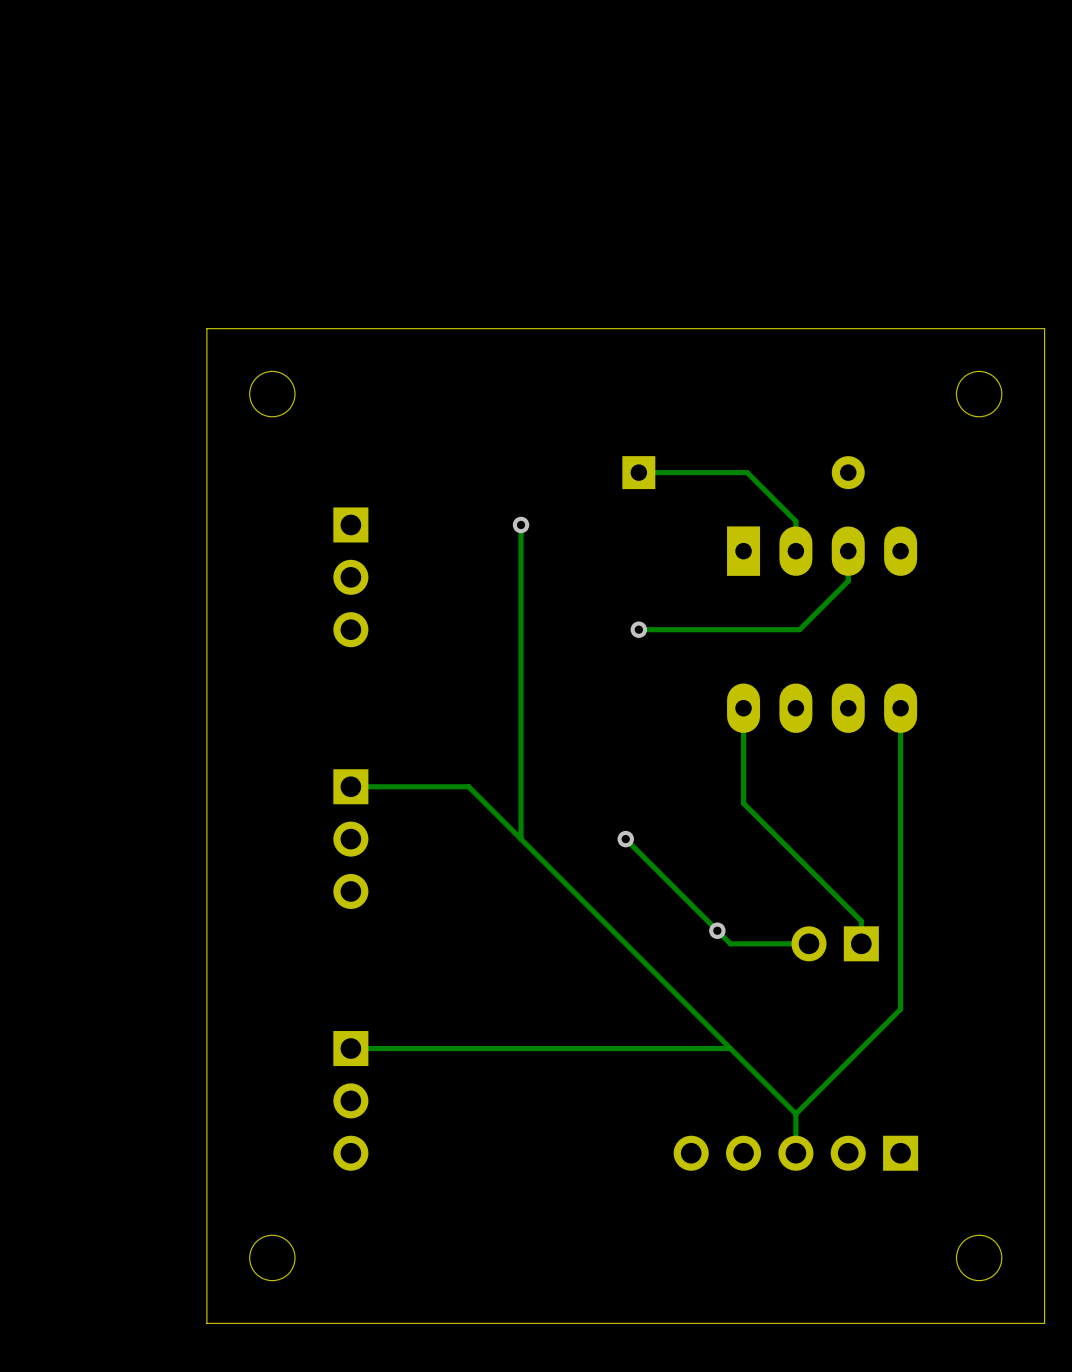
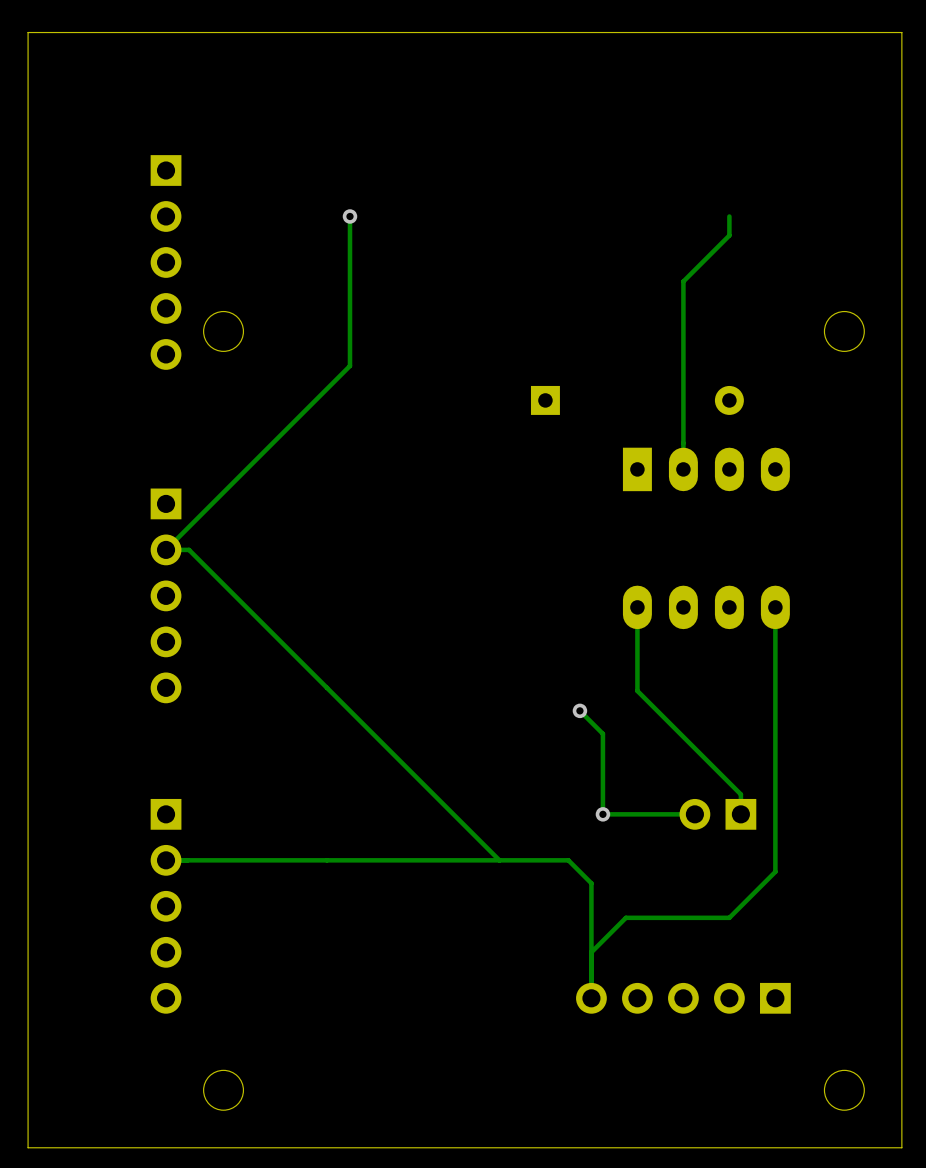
track: none -> (349, 216) (349, 365) (166, 549) (189, 549) (499, 860)
via: none -> (349, 216)
part: none -> (166, 262)
board edge: (1044, 328) (206, 328) (206, 1323) -> (901, 273) (901, 32) (28, 32) (28, 1147) (166, 1147)
track: (638, 472) (747, 472) (795, 521) -> (729, 216) (729, 235) (683, 281) (683, 443)
track: (521, 524) (521, 839) -> none
via: (521, 524) -> none
track: (848, 551) (848, 581) (799, 629) (638, 629) -> none
part: (350, 577) -> none
via: (638, 629) -> none
part: none -> (166, 595)
track: (350, 786) (468, 786) (795, 1113) -> none
part: (350, 839) -> none
track: (625, 839) (730, 943) -> (579, 710) (602, 733) (602, 814) (625, 814)
via position: (625, 839) -> (579, 710)
via position: (717, 930) -> (602, 814)
track: none -> (166, 860) (568, 860) (591, 883) (591, 998)
part: none -> (166, 906)
track: (730, 1048) (350, 1048) -> none
track: (848, 1061) (795, 1113) -> (729, 917) (625, 917) (591, 952)
part: (350, 1100) -> none
track: (795, 1113) (795, 1153) -> none

